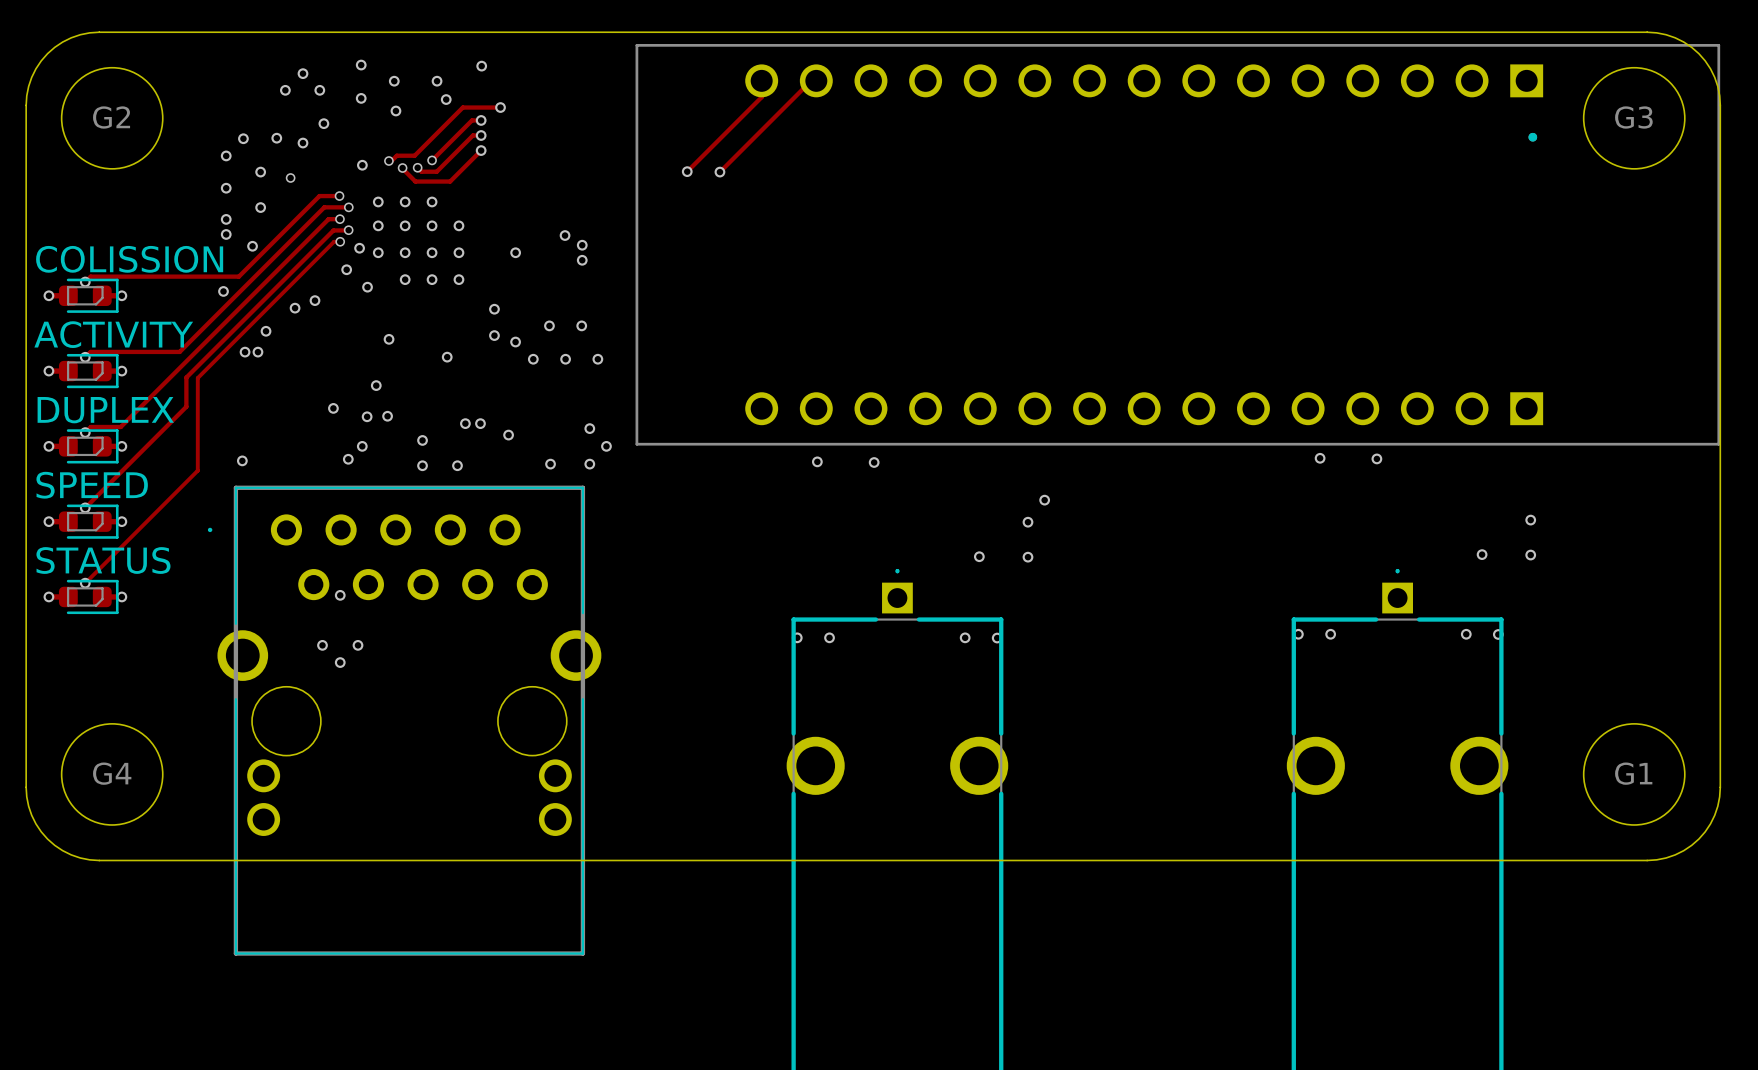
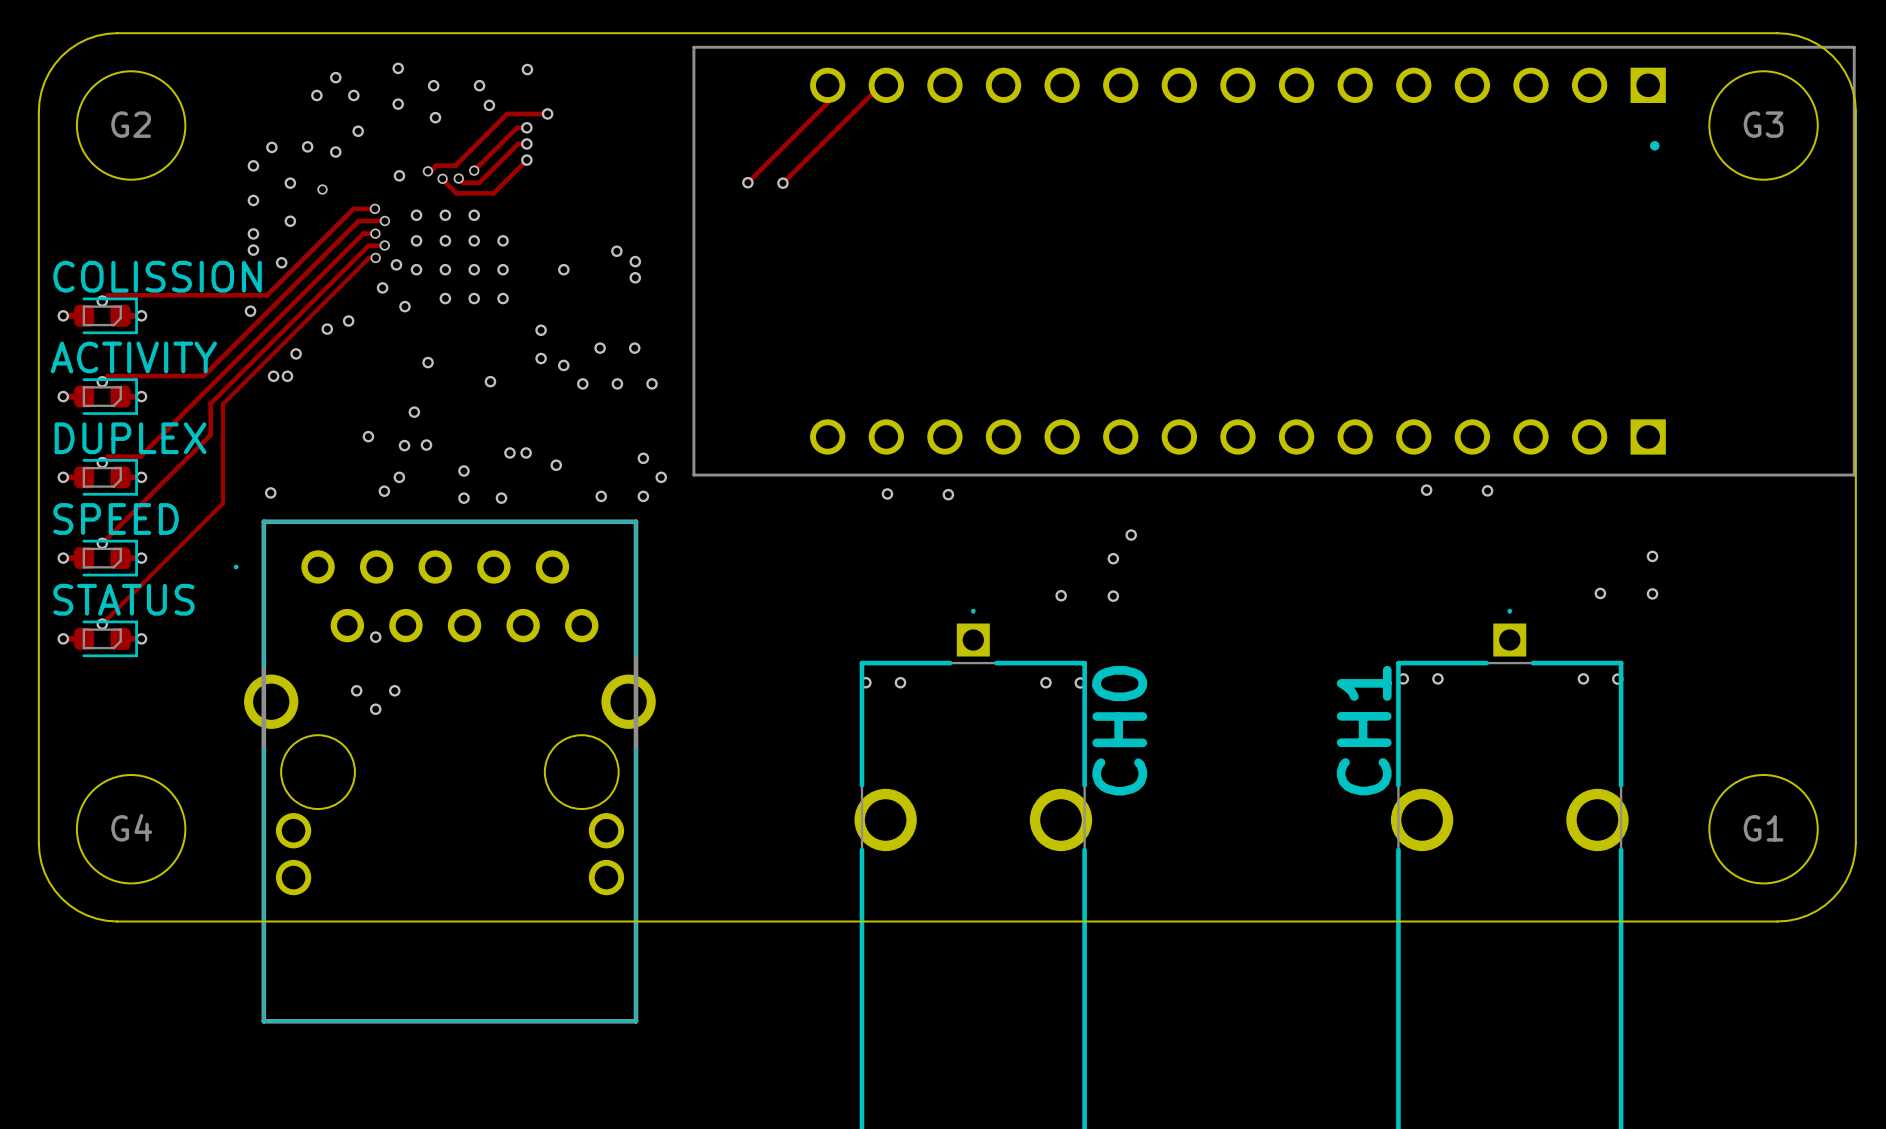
text: none -> CH0 (1119, 730)
text: none -> CH1 (1364, 730)

